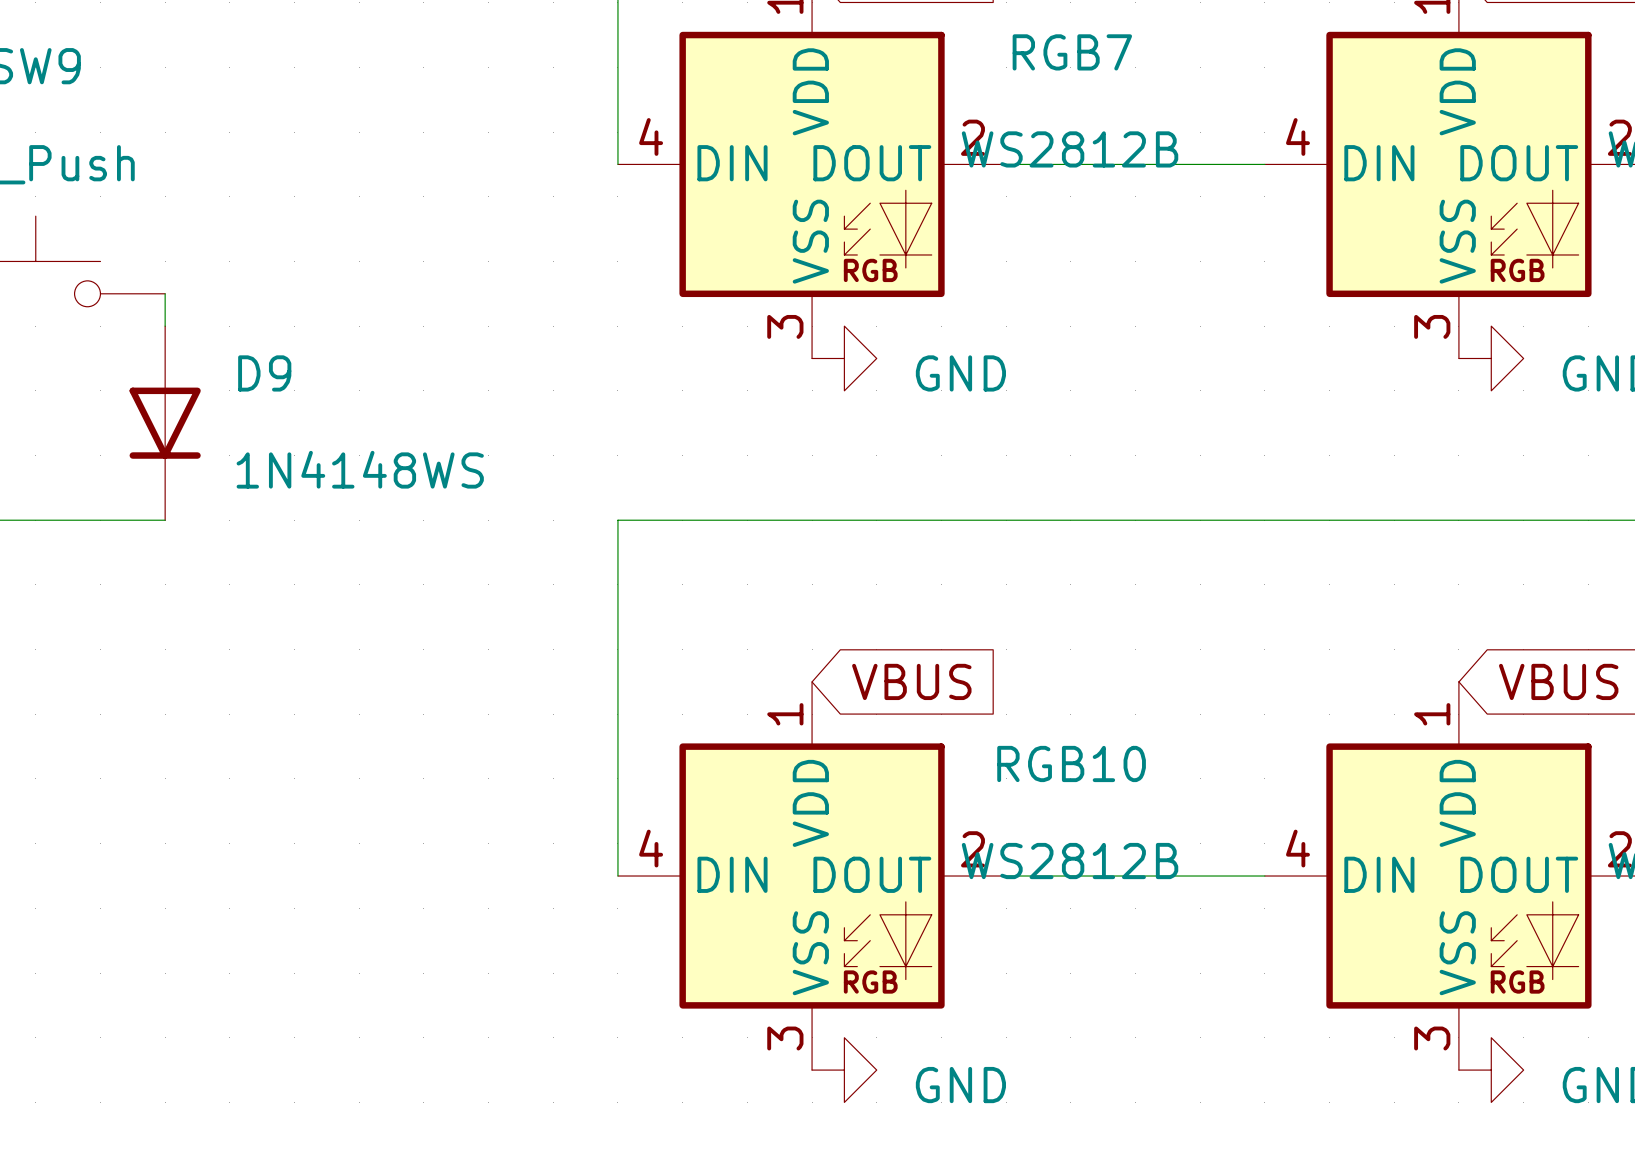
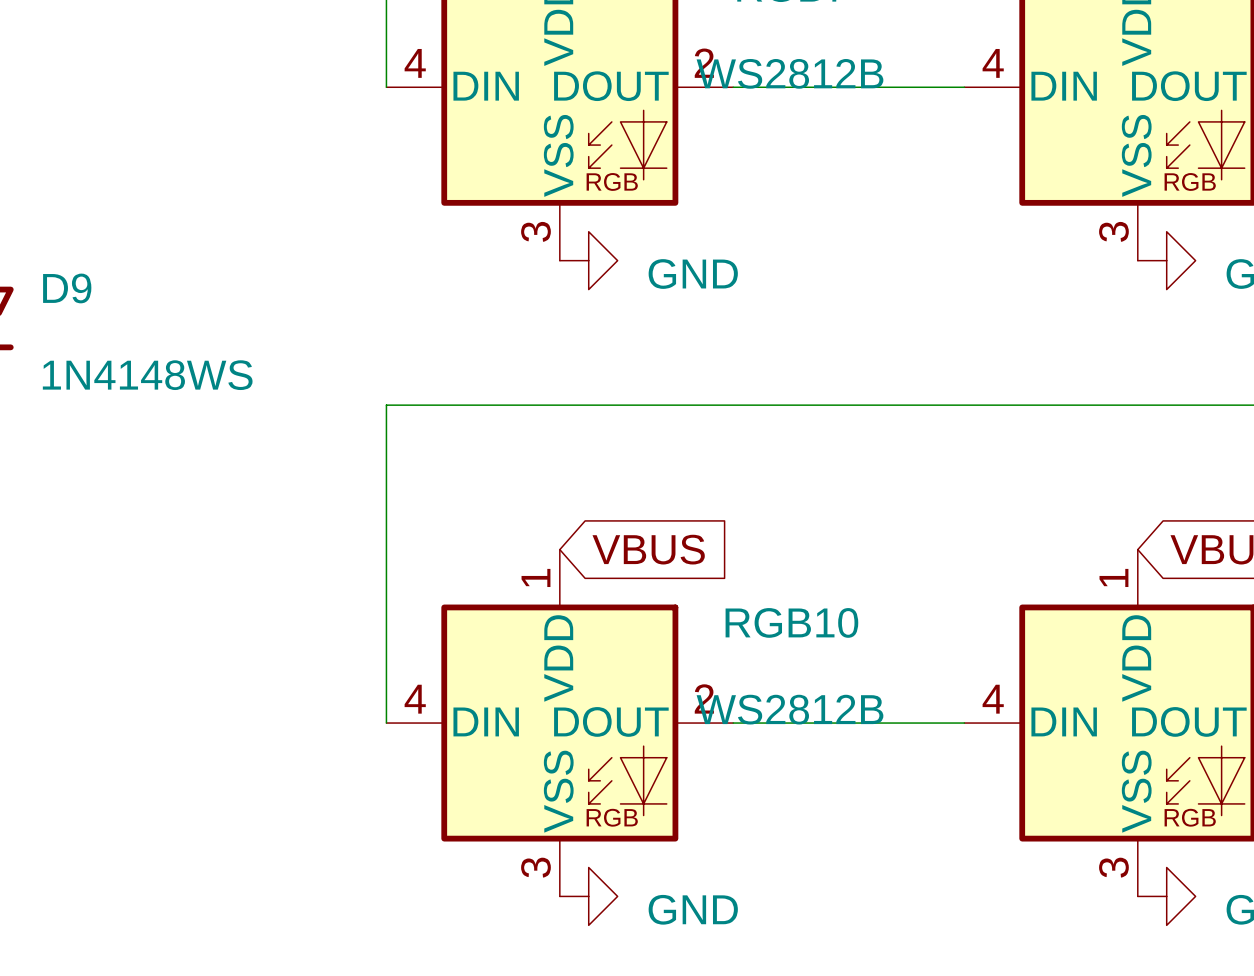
D9 name position: D9 (264, 373) -> D9 (67, 288)
D9 value position: 1N4148WS (360, 469) -> 1N4148WS (147, 375)

